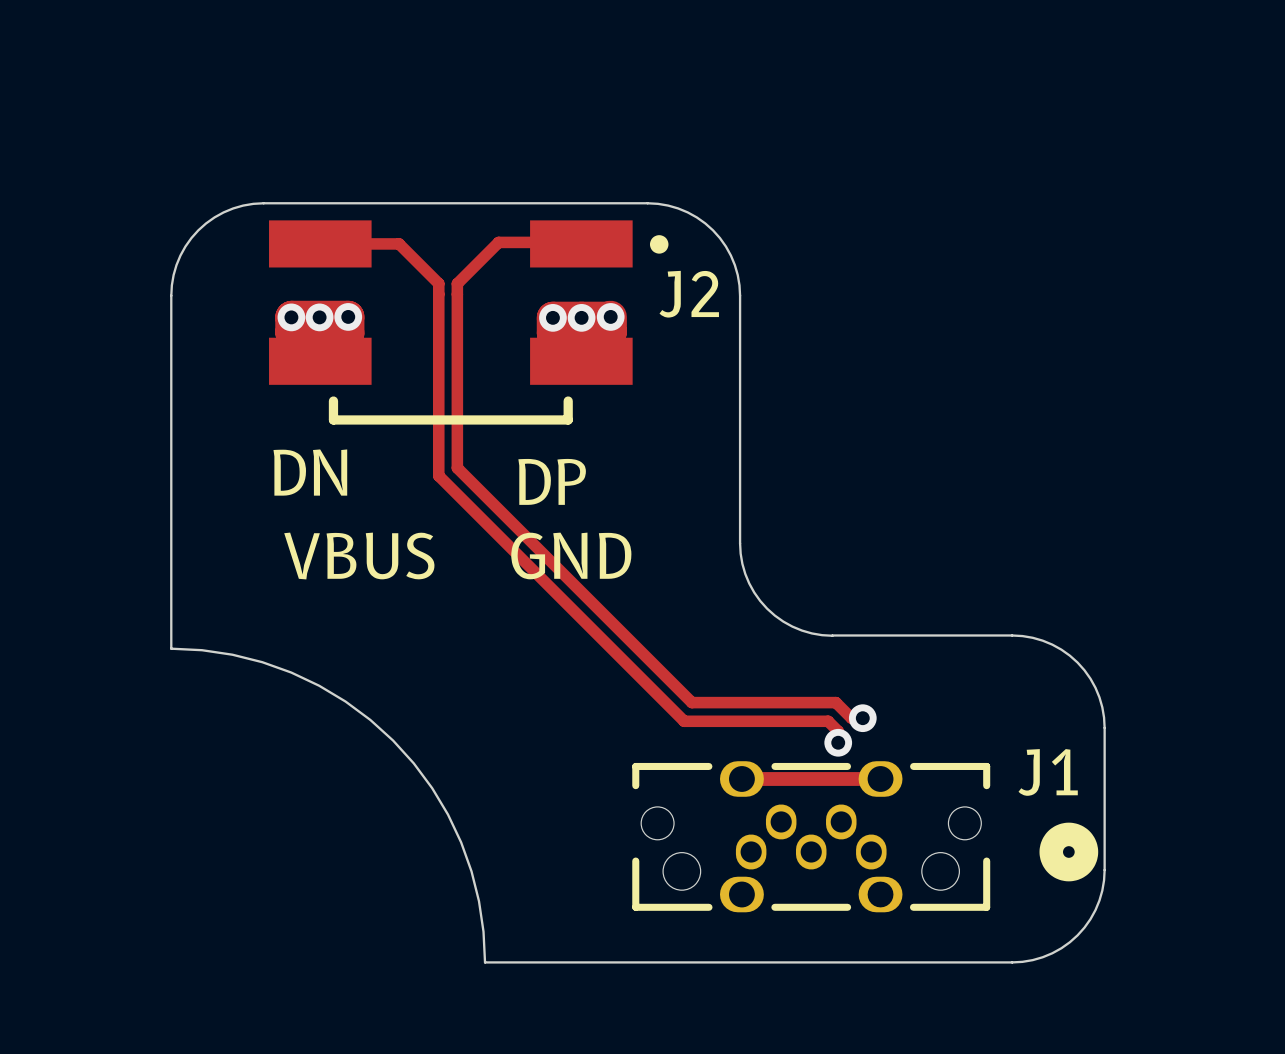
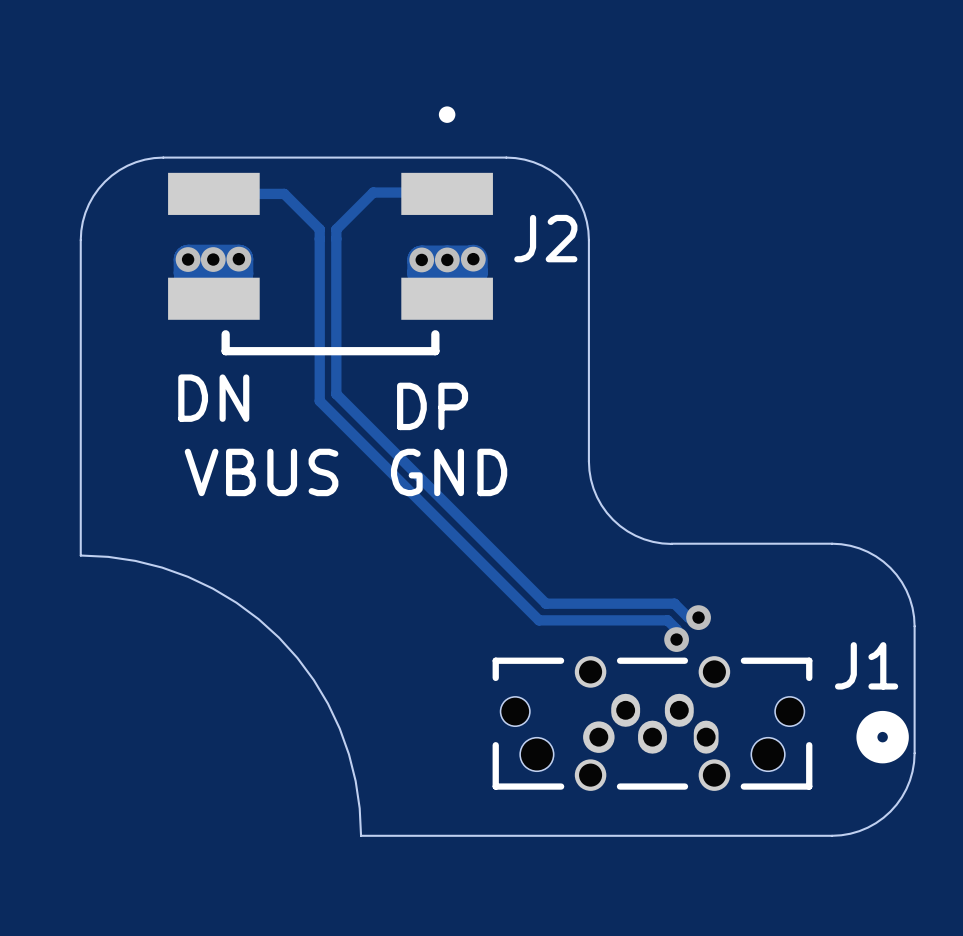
J2 footprint: [269, 220, 669, 425] -> [168, 106, 493, 356]
J1 footprint: [632, 761, 1099, 913] -> [492, 656, 909, 791]
track: (741, 778) (880, 778) -> none

